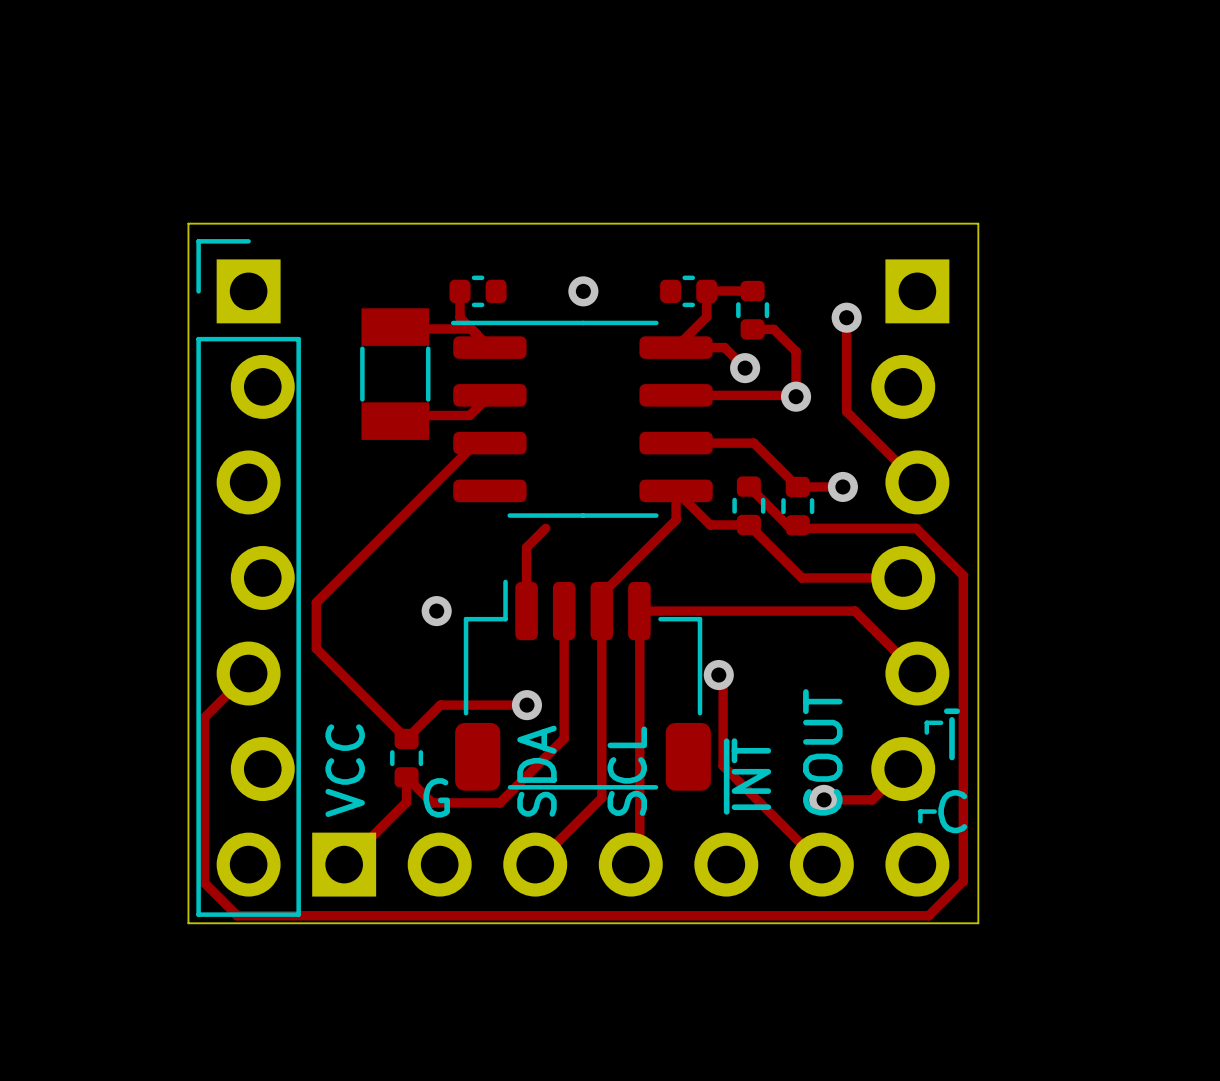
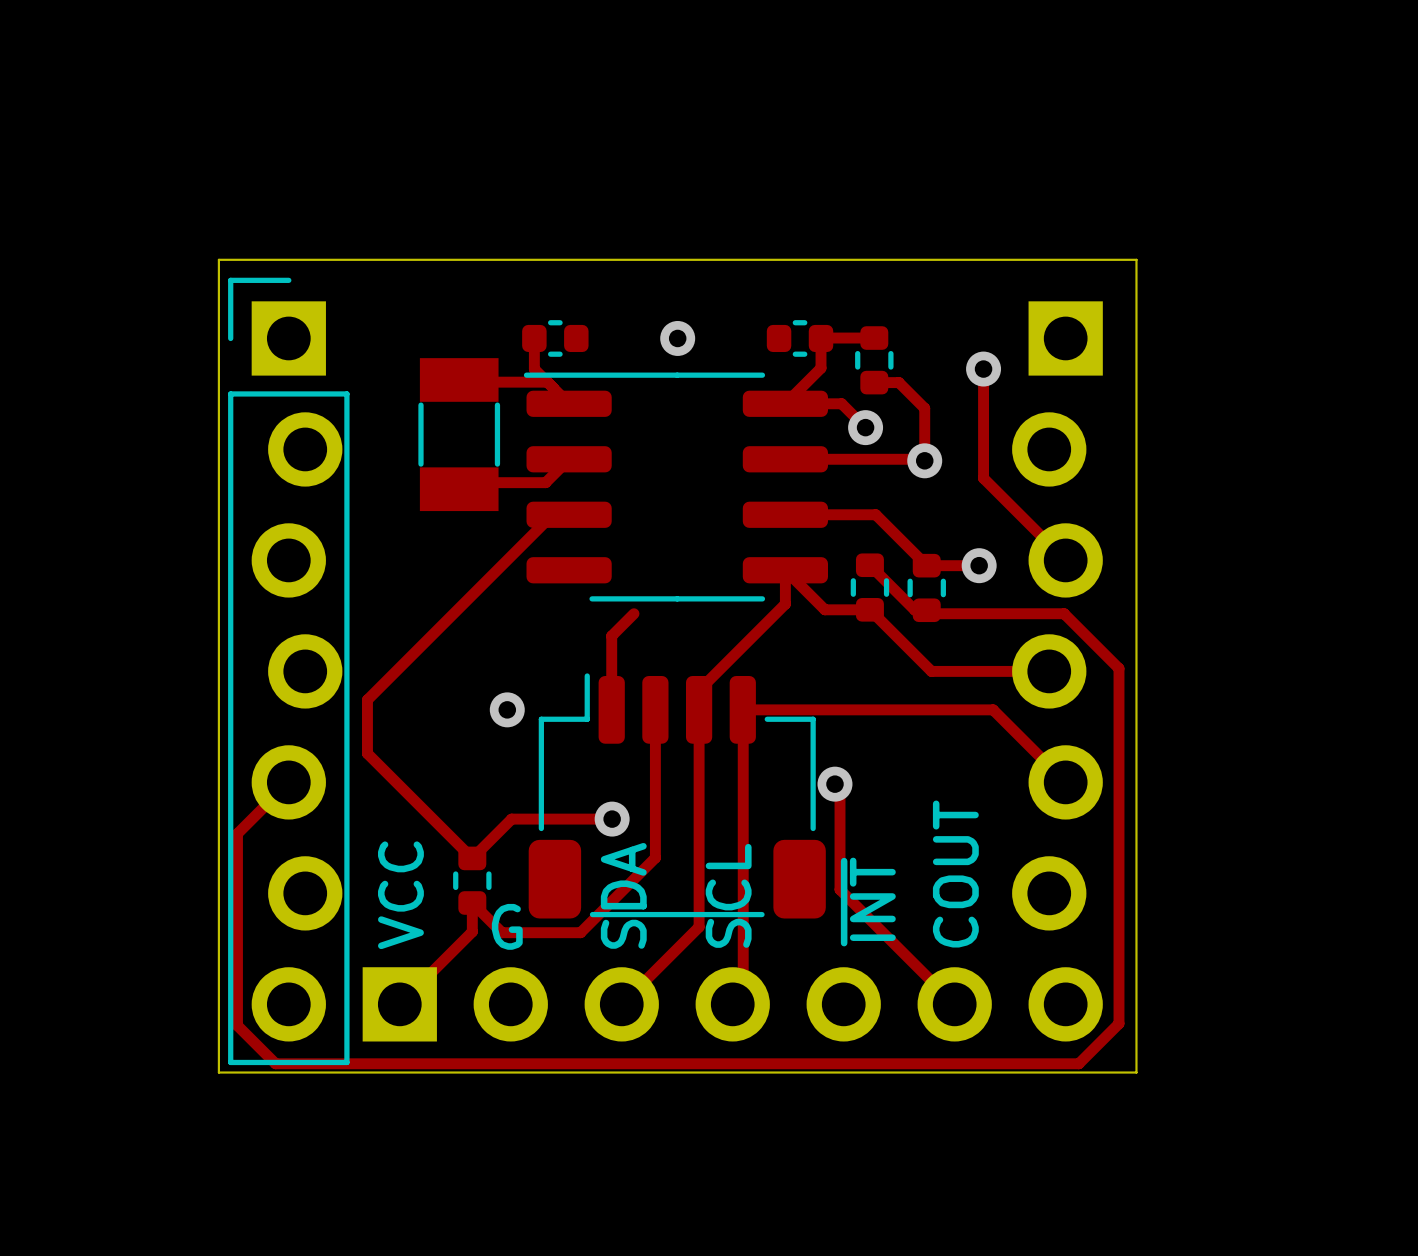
line: (941, 722) (926, 722) (926, 732) -> none
text: ~{I} (951, 734) -> none
track: (903, 769) (872, 799) (824, 799) -> none
via: (824, 799) -> none
line: (934, 811) (920, 811) (920, 821) -> none
text: C (952, 811) -> none

